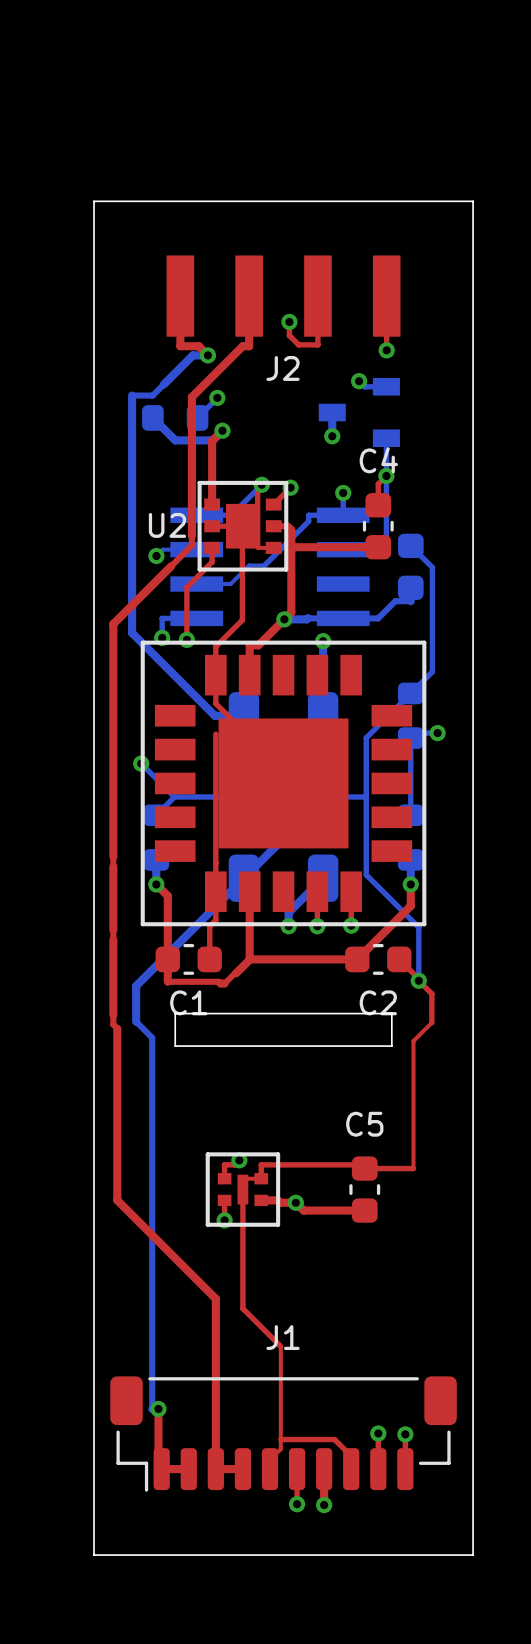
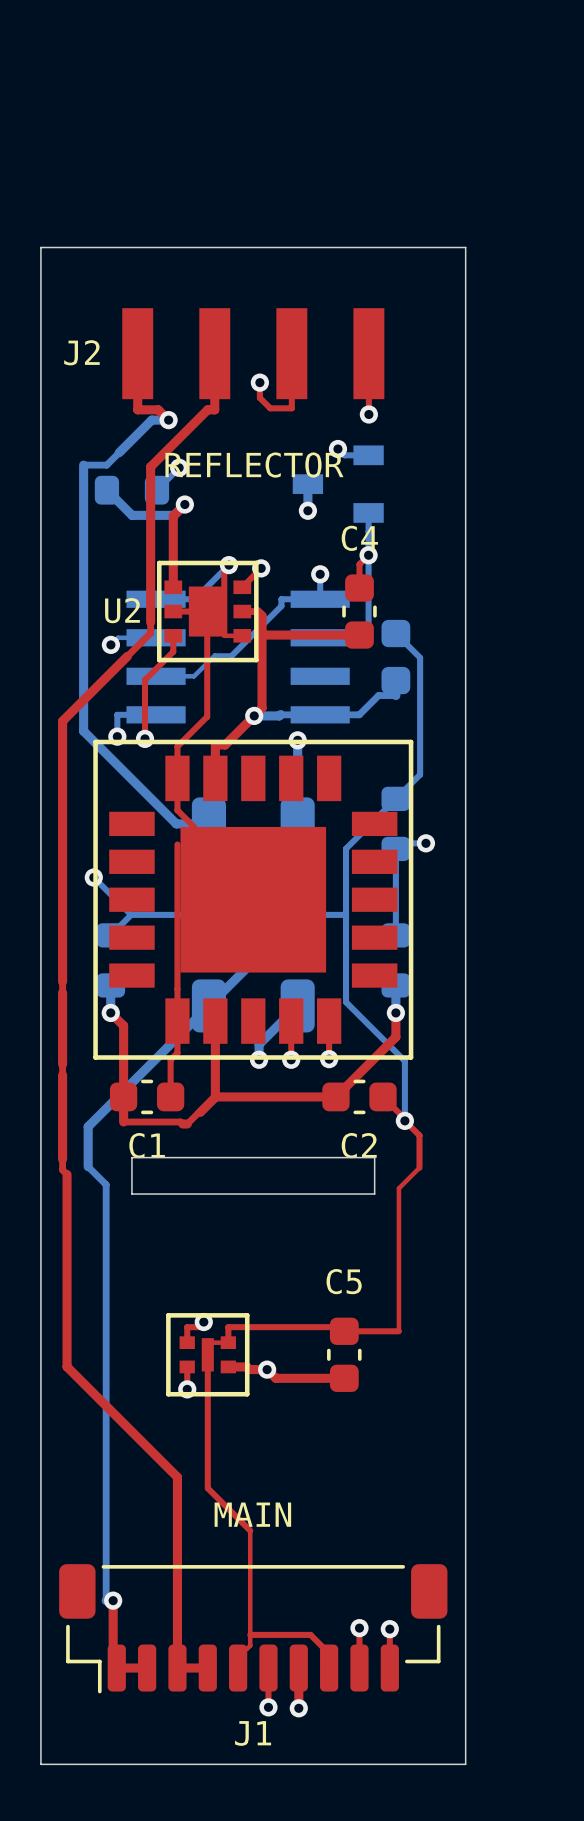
J2 name position: J2 (283, 368) -> J2 (81, 352)
text: none -> REFLECTOR (254, 465)
text: none -> MAIN (252, 1514)
J1 name position: J1 (283, 1337) -> J1 (253, 1733)

